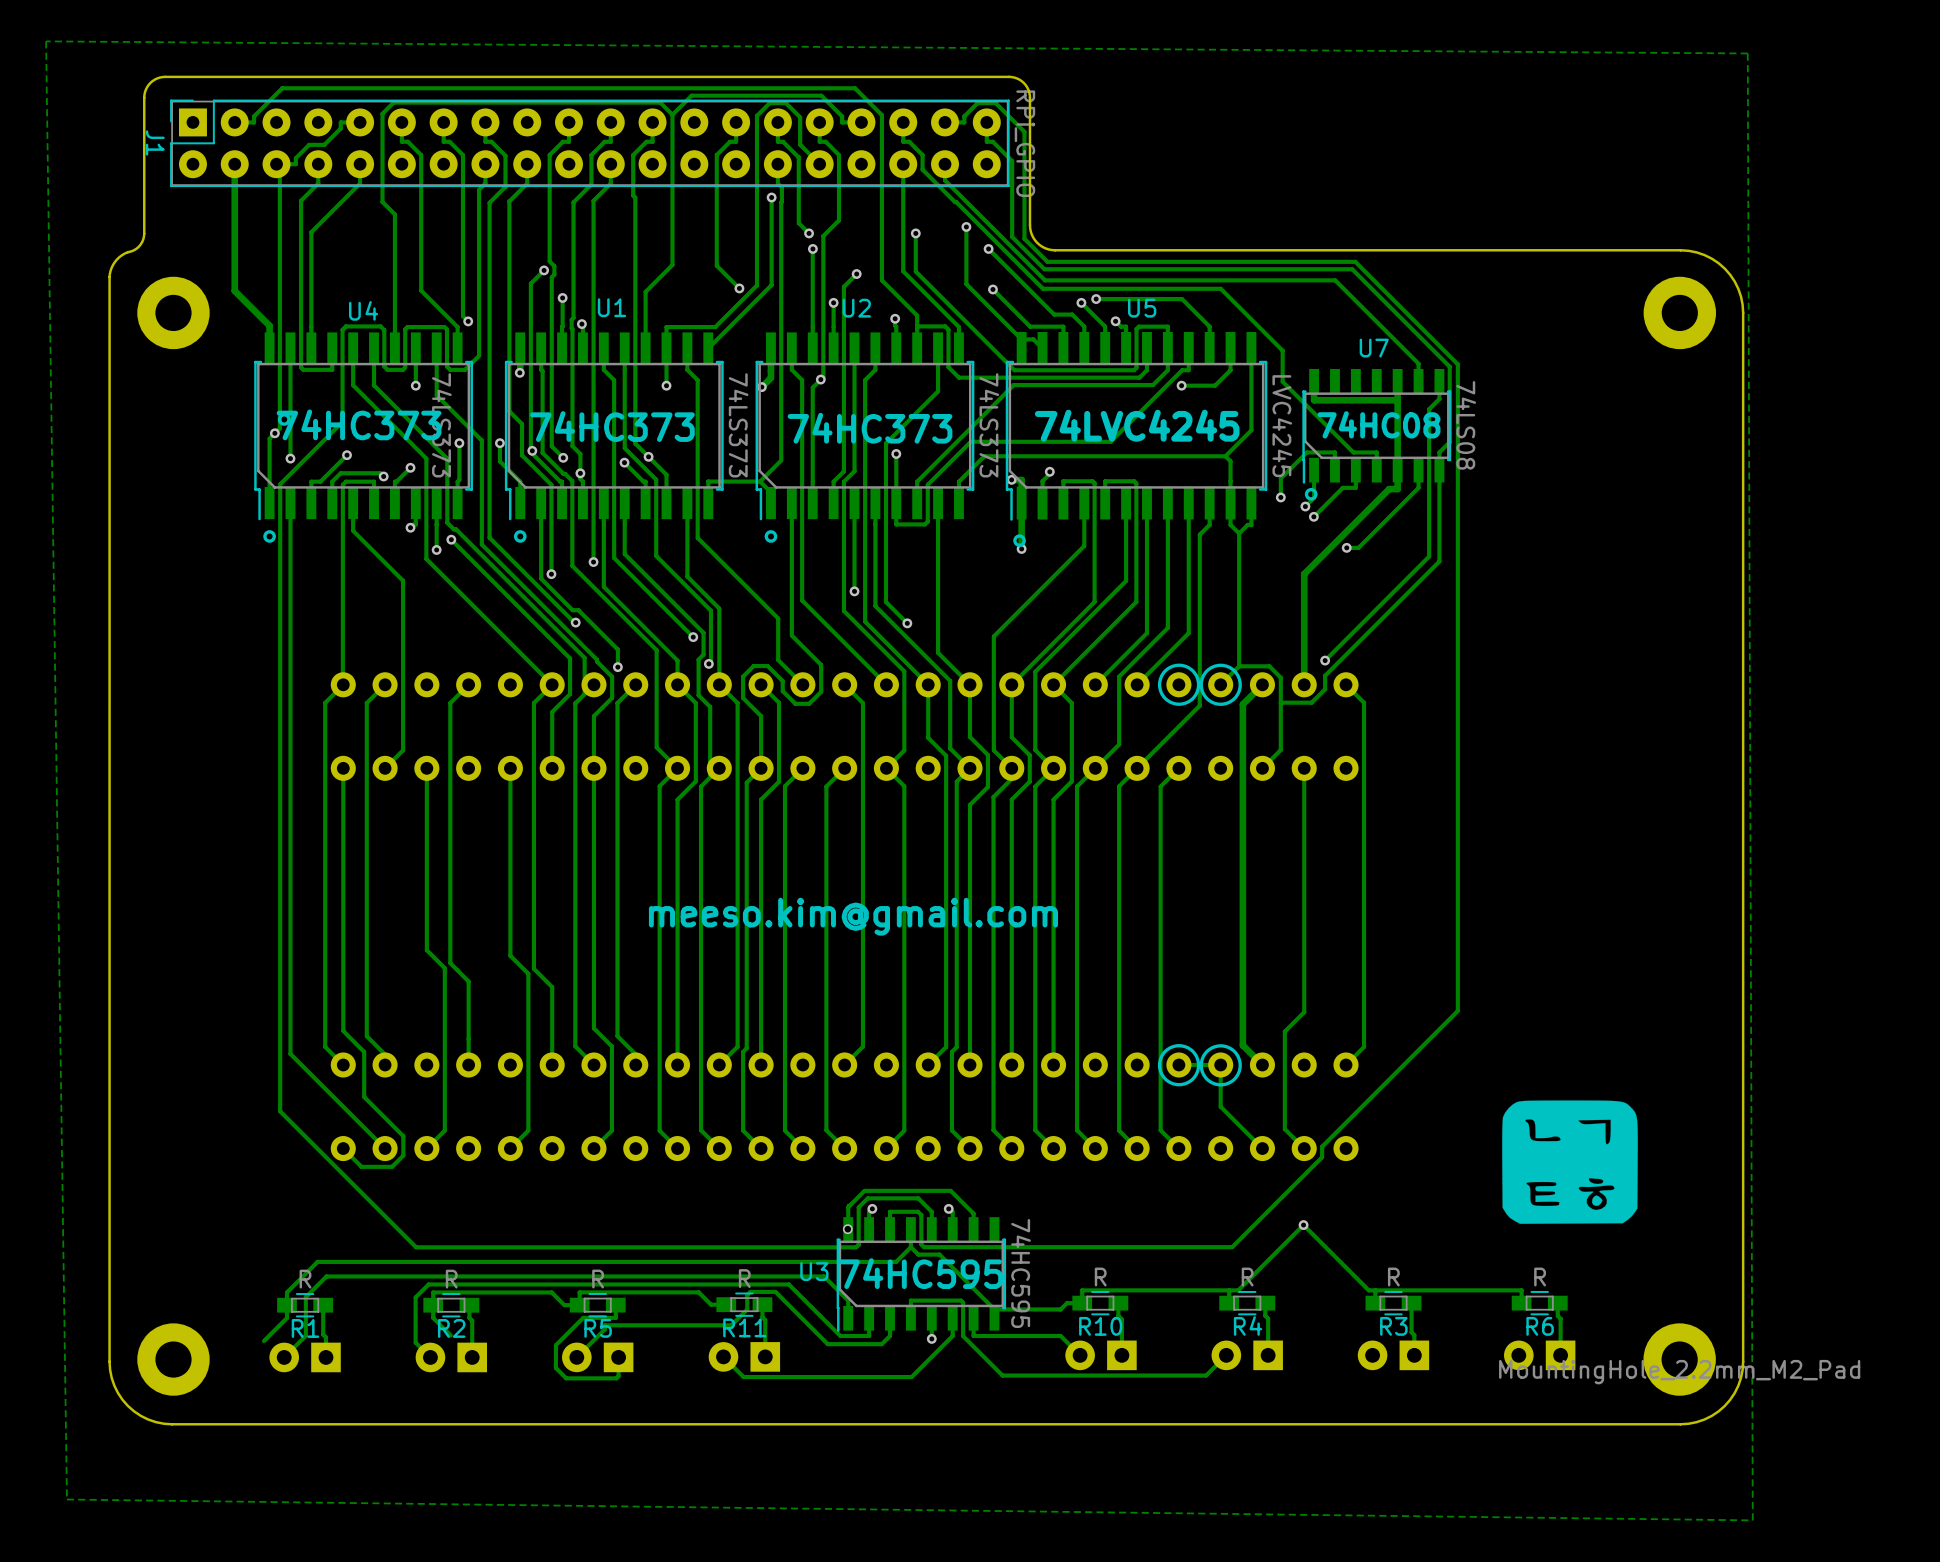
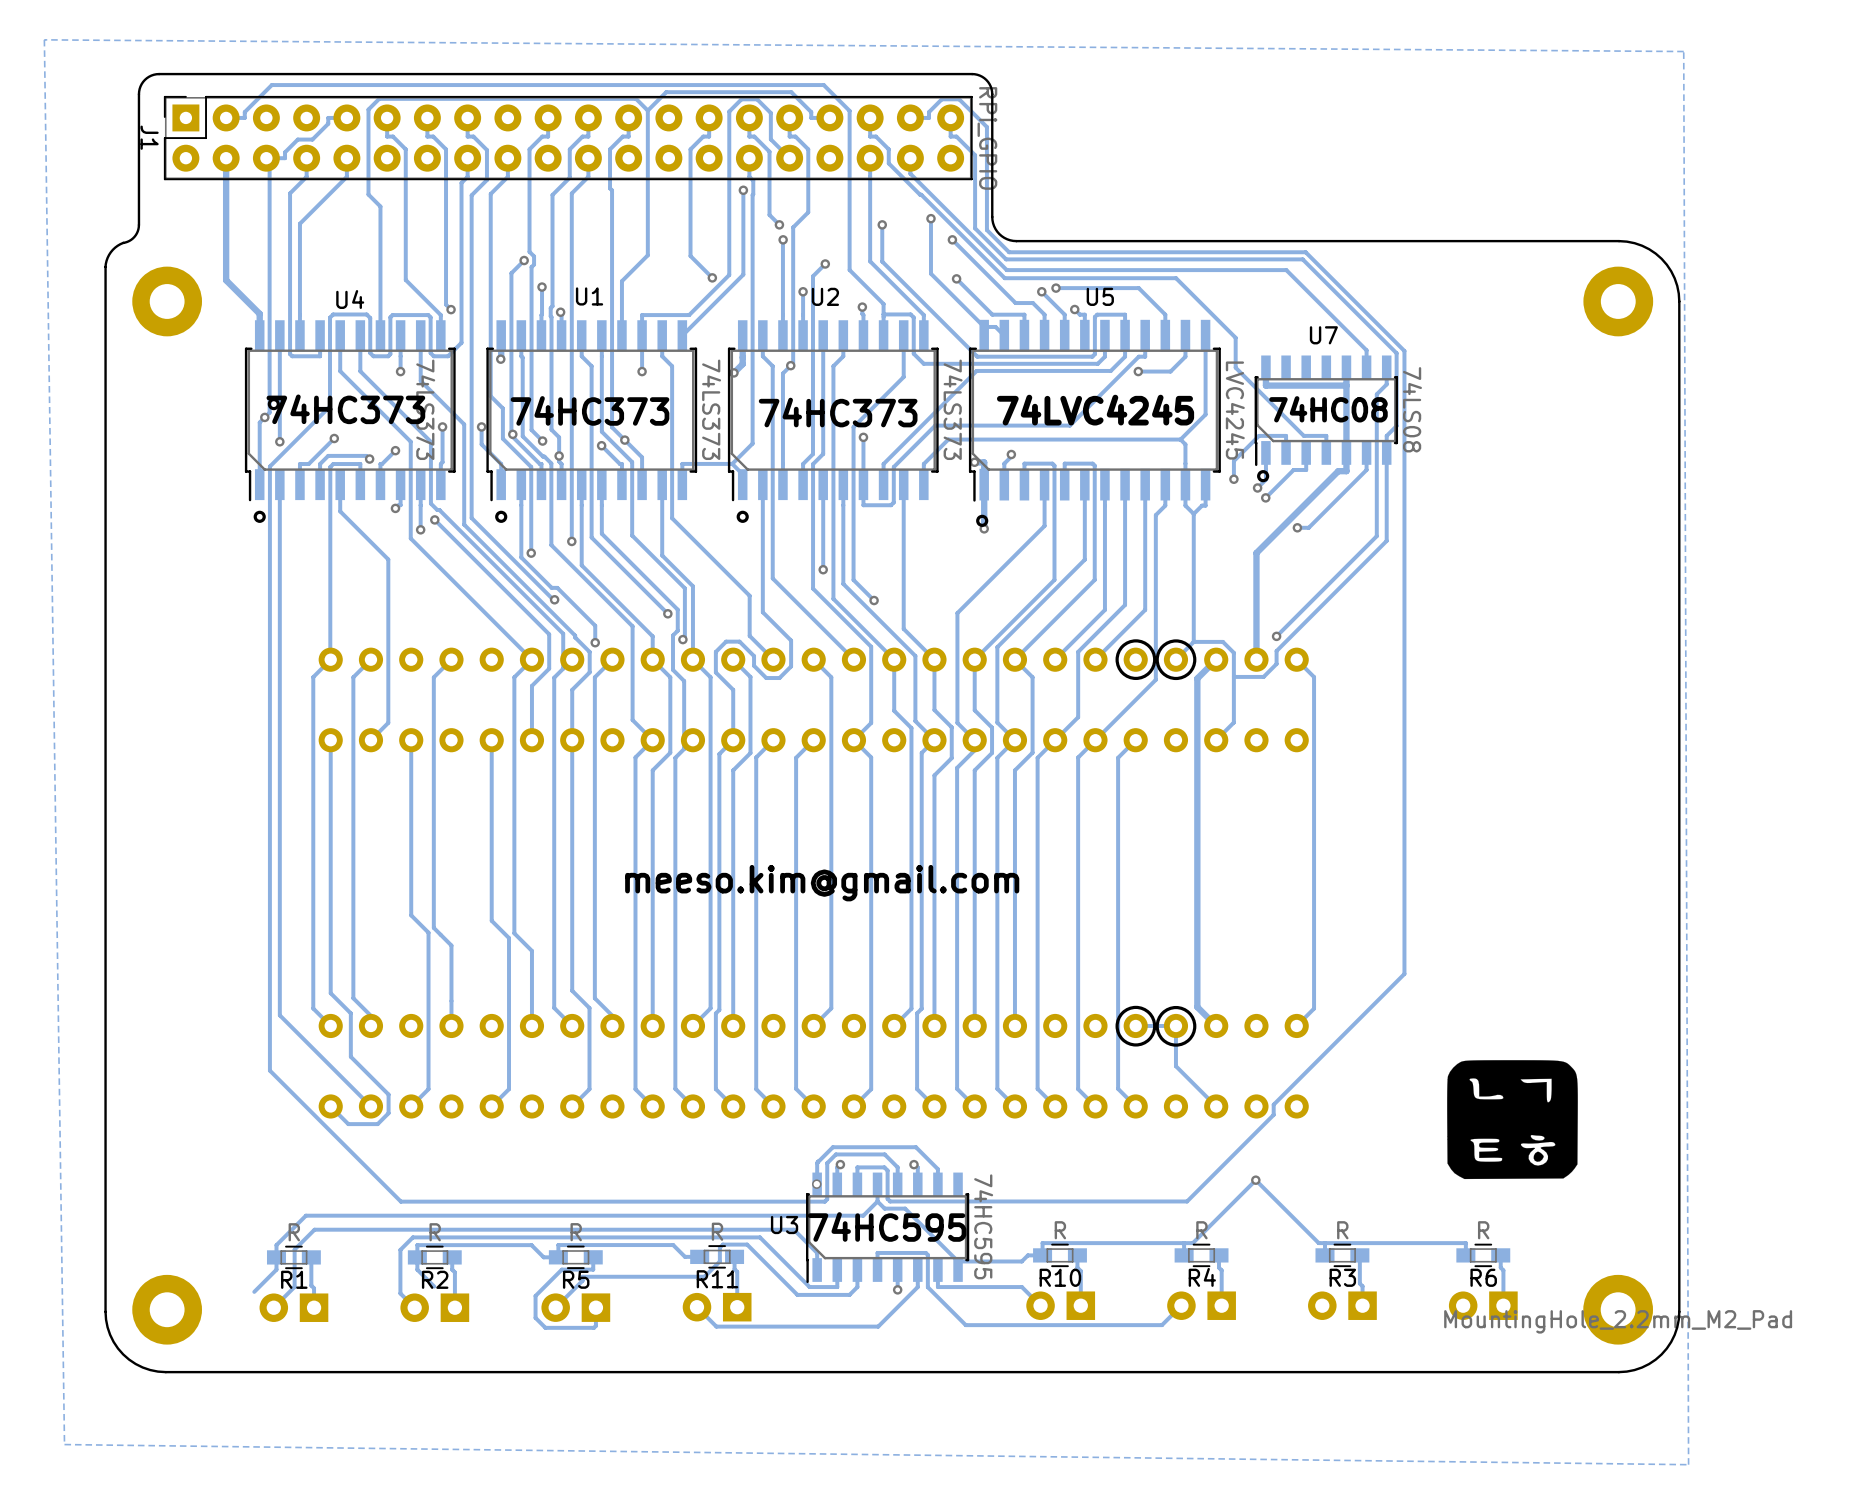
track: (1304, 768) (1304, 1012) (1284, 1031) (1284, 1129) (1304, 1148) -> none

